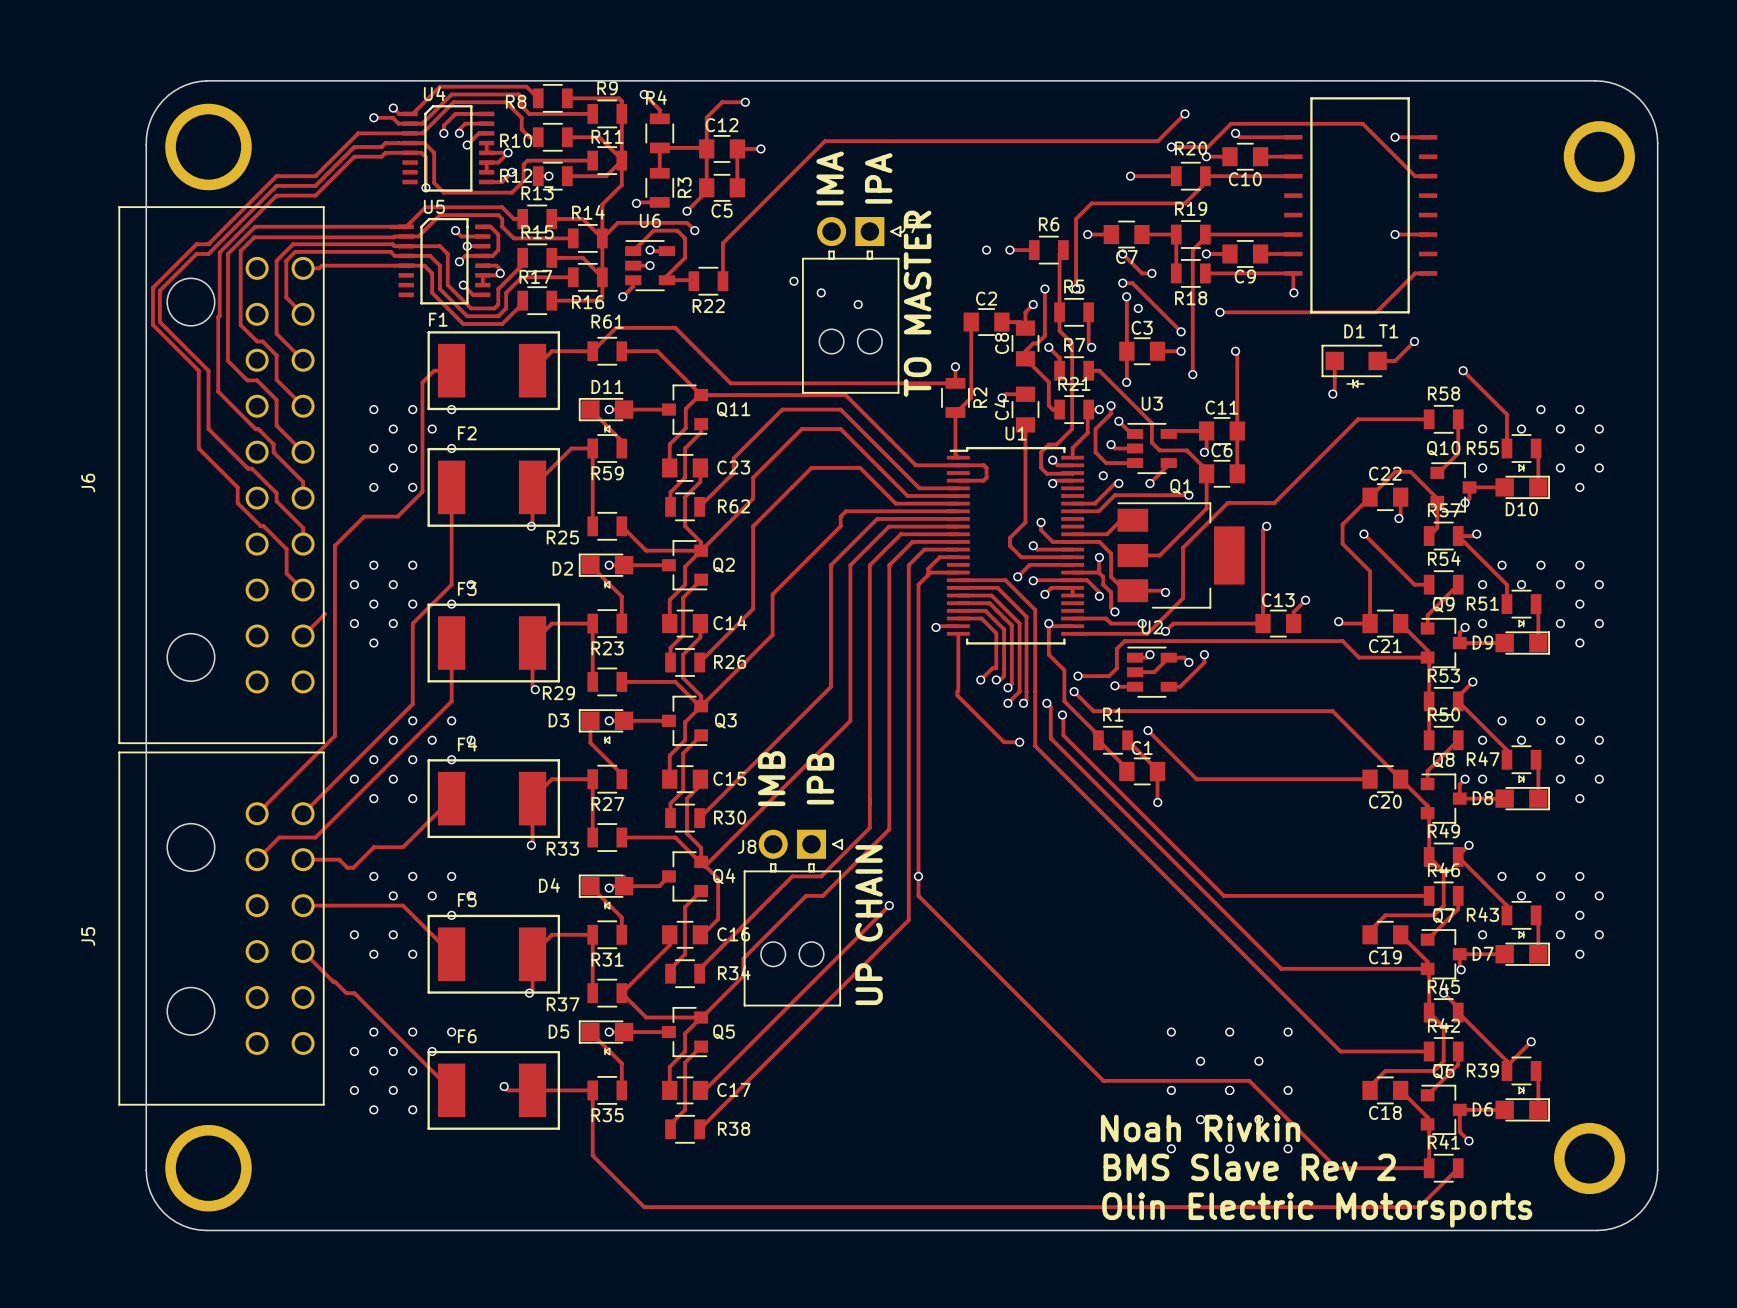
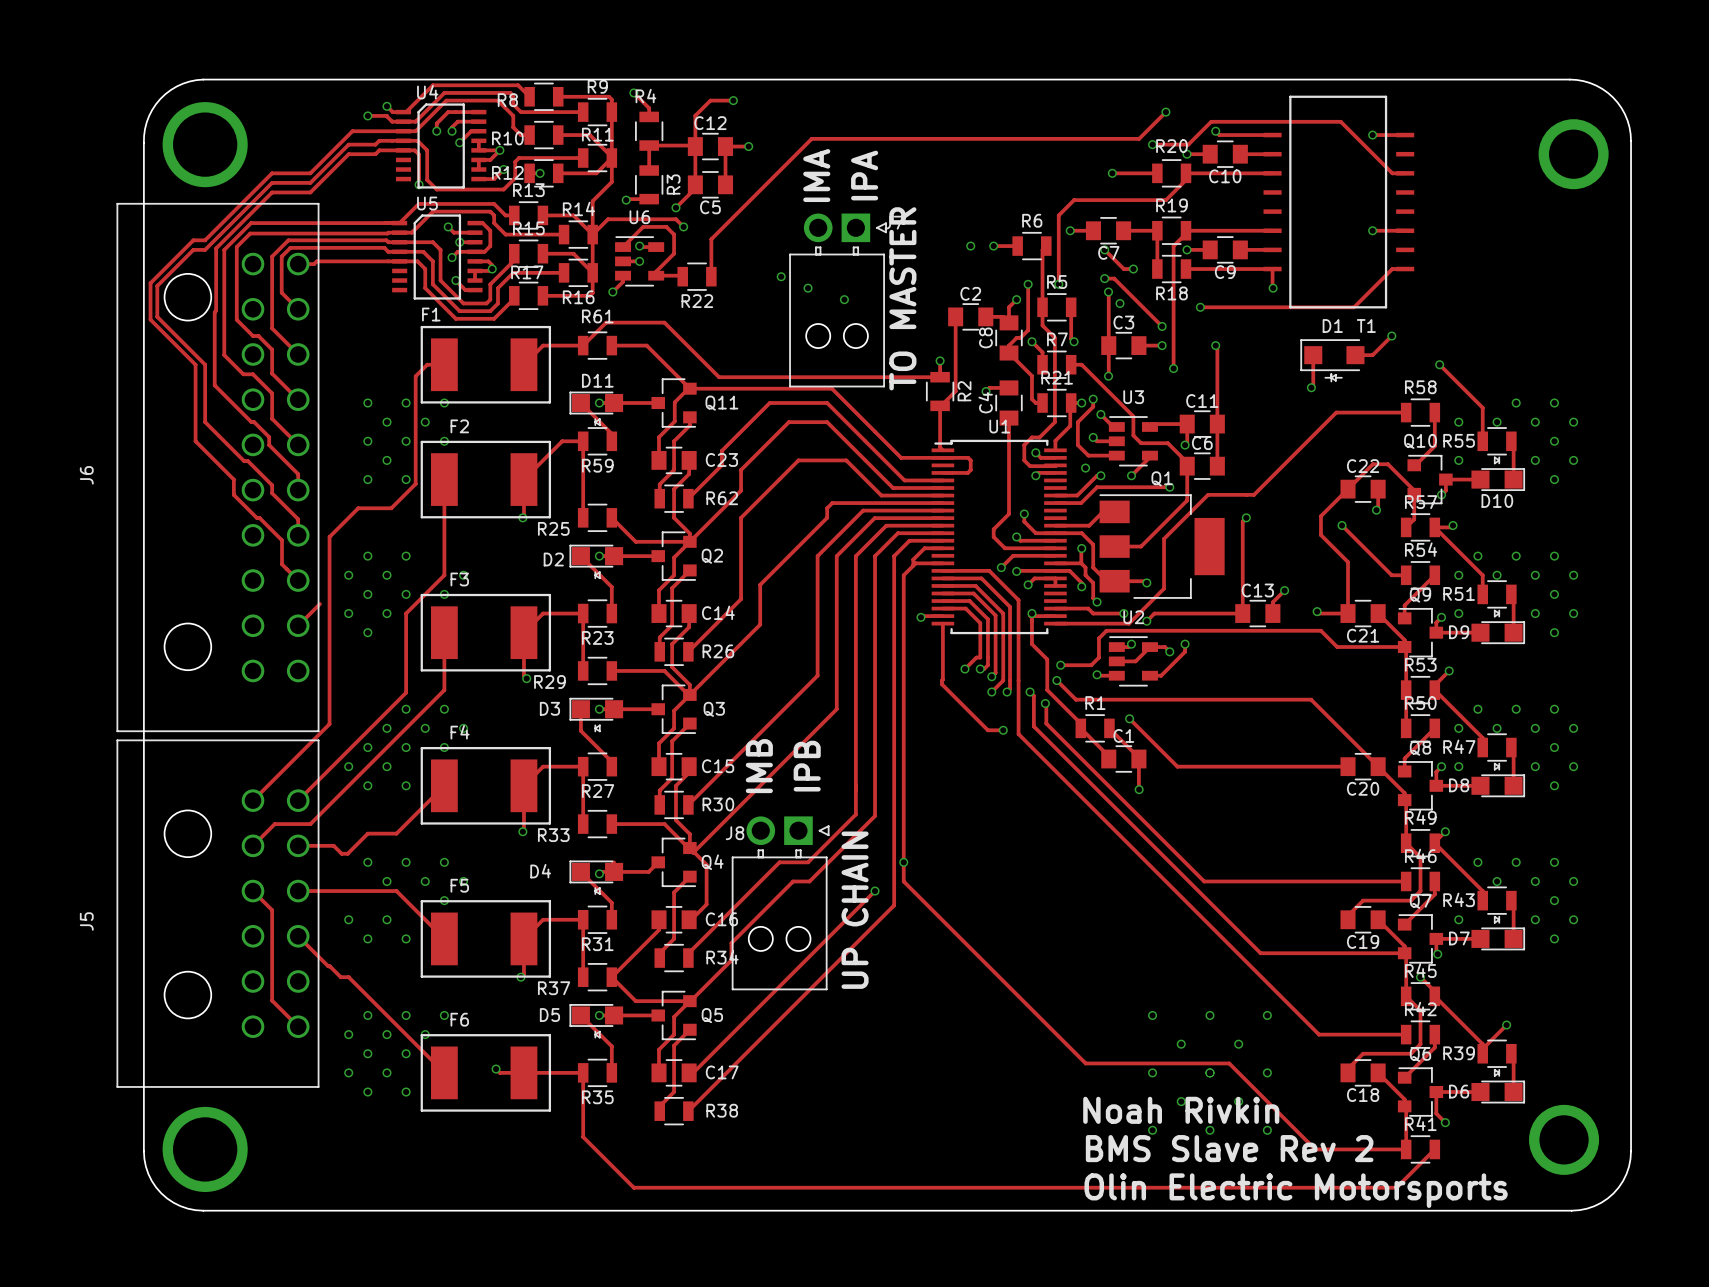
track: none -> (253, 891) (272, 910) (272, 1000) (298, 1026)

